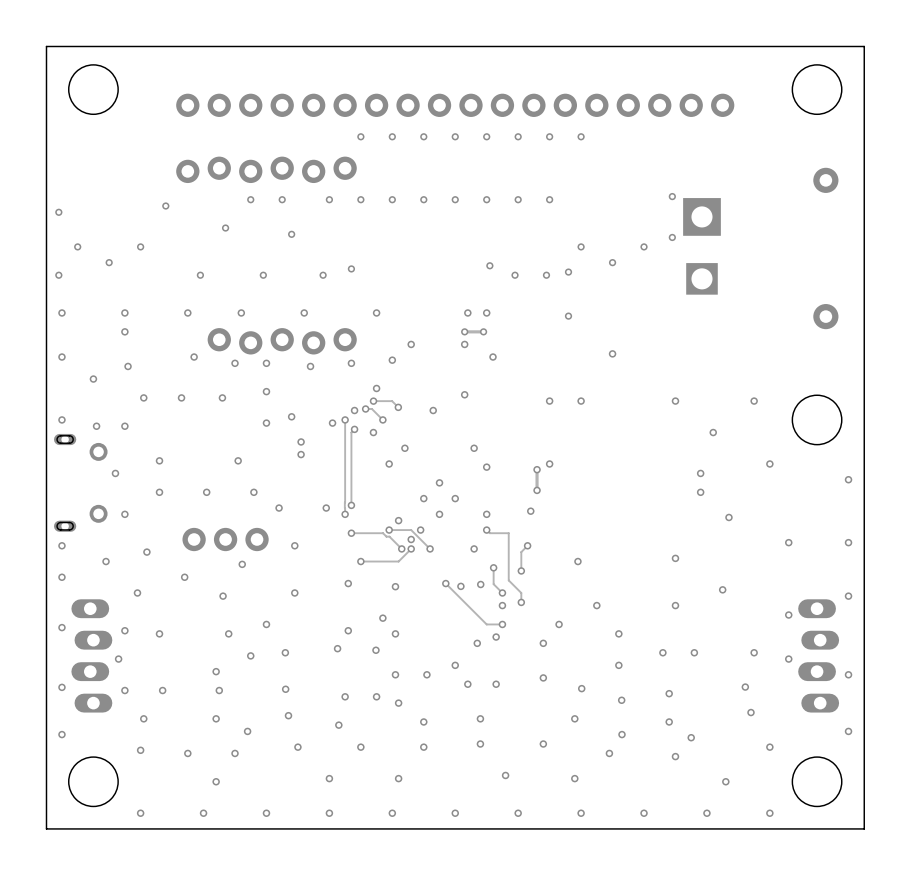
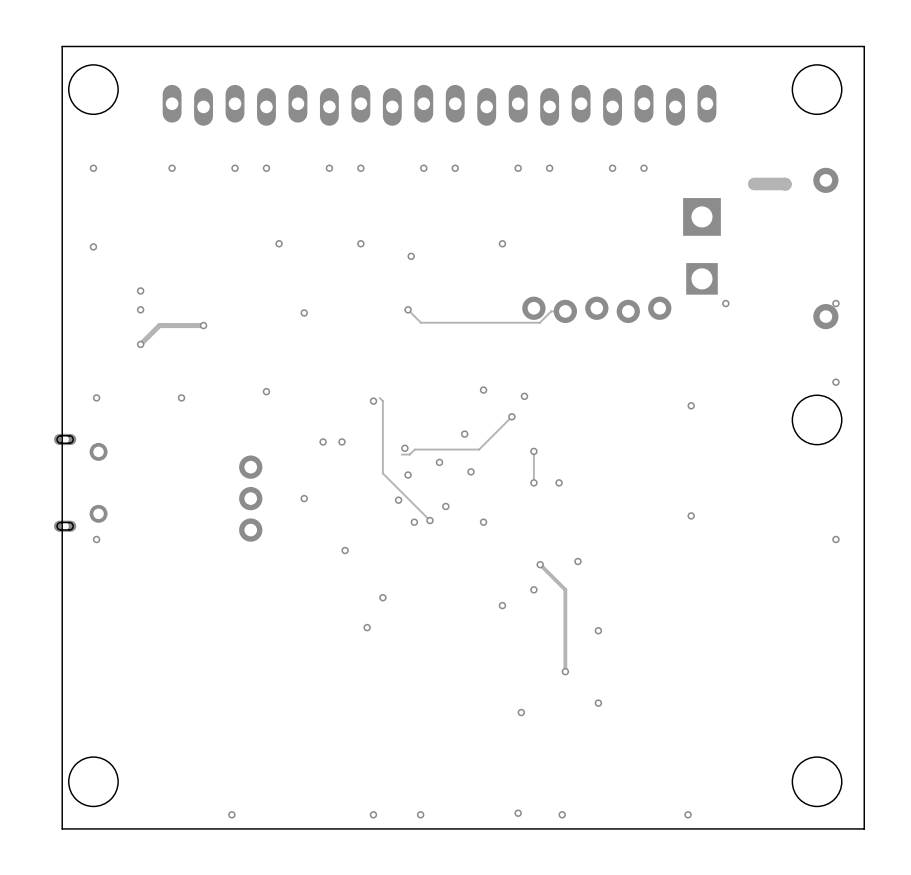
board edge: (62, 46) (46, 46) (46, 828) (62, 828) -> (62, 46) (62, 828)
part: none -> (297, 105)
part: (455, 105) -> none
part: none -> (581, 105)
via: (360, 136) -> none
via: (392, 136) -> none
via: (423, 136) -> none
via: (455, 136) -> none
via: (486, 136) -> none
via: (518, 136) -> none
via: (549, 136) -> none
via: (581, 136) -> none
via: none -> (93, 168)
via: none -> (172, 168)
via: none -> (235, 168)
via: none -> (266, 168)
via: none -> (329, 168)
via: none -> (360, 168)
via: none -> (423, 168)
via: none -> (455, 168)
via: none -> (518, 168)
via: none -> (549, 168)
via: none -> (612, 168)
via: none -> (644, 168)
part: (266, 169) -> none
track: none -> (754, 183) (785, 184)
via: (672, 196) -> none
via: (250, 199) -> none
via: (282, 199) -> none
via: (329, 199) -> none
via: (360, 199) -> none
via: (392, 199) -> none
via: (423, 199) -> none
via: (455, 199) -> none
via: (486, 199) -> none
via: (518, 199) -> none
via: (549, 199) -> none
via: (165, 206) -> none
via: (58, 212) -> none
via: (225, 228) -> none
via: (291, 234) -> none
via: (672, 237) -> none
via: none -> (279, 243)
via: none -> (360, 243)
via: none -> (502, 243)
via: (77, 246) -> none
via: none -> (93, 246)
via: (140, 246) -> none
via: (581, 246) -> none
via: (644, 246) -> none
via: none -> (411, 256)
via: (109, 262) -> none
via: (612, 262) -> none
via: (489, 265) -> none
via: (351, 268) -> none
via: (568, 272) -> none
via: (58, 275) -> none
via: (200, 275) -> none
via: (263, 275) -> none
via: (323, 275) -> none
via: (515, 275) -> none
via: (546, 275) -> none
via: none -> (140, 290)
via: none -> (725, 303)
via: none -> (835, 303)
via: none -> (140, 309)
track: none -> (408, 309) (420, 322) (539, 322) (551, 311) (565, 311)
via: none -> (408, 309)
part: none -> (596, 309)
via: (61, 312) -> none
via: (124, 312) -> none
via: (187, 312) -> none
via: (241, 312) -> none
via: (376, 312) -> none
via: (467, 312) -> none
via: (486, 312) -> none
via: (568, 316) -> none
track: none -> (203, 325) (159, 325) (140, 344)
via: none -> (203, 325)
via: (124, 331) -> none
via: (464, 331) -> none
track: (483, 331) (464, 331) -> none
via: (483, 331) -> none
part: (282, 341) -> none
via: none -> (140, 344)
via: (411, 344) -> none
via: (464, 344) -> none
via: (612, 353) -> none
via: (61, 357) -> none
via: (194, 357) -> none
via: (493, 357) -> none
via: (392, 360) -> none
via: (235, 363) -> none
via: (266, 363) -> none
via: (351, 363) -> none
via: (128, 366) -> none
via: (310, 366) -> none
via: (93, 379) -> none
via: none -> (835, 382)
via: (376, 388) -> none
via: none -> (483, 390)
via: (464, 394) -> none
via: none -> (524, 396)
via: none -> (96, 397)
via: (143, 397) -> none
via: (222, 397) -> none
track: none -> (379, 397) (382, 401) (382, 473) (429, 520)
track: (373, 401) (392, 401) (398, 407) -> none
via: (549, 401) -> none
via: (581, 401) -> none
via position: (675, 401) -> (691, 405)
via: (754, 401) -> none
via: (398, 407) -> none
track: (365, 409) (371, 409) (382, 419) -> none
via: (365, 409) -> none
via: (354, 410) -> none
via: (433, 410) -> none
via: (291, 416) -> none
track: none -> (511, 416) (479, 449) (414, 449) (409, 454) (401, 454)
via: none -> (511, 416)
via: (61, 419) -> none
track: (345, 419) (345, 514) -> none
via: (345, 419) -> none
via: (382, 419) -> none
via: (266, 423) -> none
via: (332, 423) -> none
via: (96, 426) -> none
via: (124, 426) -> none
track: (354, 429) (351, 432) (351, 505) -> none
via: (354, 429) -> none
via: (373, 432) -> none
via: (713, 432) -> none
via: none -> (464, 434)
via: (301, 441) -> none
via: none -> (323, 441)
via: none -> (341, 441)
via: (474, 448) -> none
track: none -> (533, 451) (533, 482)
via: none -> (533, 451)
via: (301, 454) -> none
via: (159, 460) -> none
via: (238, 460) -> none
via: none -> (439, 462)
via: (389, 463) -> none
via: (549, 463) -> none
via: (769, 463) -> none
via: (486, 467) -> none
track: (537, 469) (537, 490) -> none
via: (537, 469) -> none
via: none -> (470, 471)
via: (115, 473) -> none
via: (700, 473) -> none
via: none -> (408, 475)
via: (848, 479) -> none
via: (439, 482) -> none
via: none -> (533, 482)
via: none -> (559, 482)
via: (537, 490) -> none
via: (159, 492) -> none
via: (206, 492) -> none
via: (253, 492) -> none
via: (700, 492) -> none
via: none -> (304, 498)
via: (423, 498) -> none
via: (455, 498) -> none
via: none -> (398, 500)
via: (351, 505) -> none
via: none -> (445, 506)
via: (279, 508) -> none
via: (326, 508) -> none
via: (530, 511) -> none
via: (124, 514) -> none
via: (345, 514) -> none
via: (439, 514) -> none
via: (486, 514) -> none
via: none -> (691, 515)
via: (728, 517) -> none
via: (398, 520) -> none
via: none -> (429, 520)
via: none -> (414, 522)
via: none -> (483, 522)
track: (389, 530) (411, 530) (430, 548) -> none
via: (389, 530) -> none
via: (420, 530) -> none
track: (486, 530) (489, 533) (508, 533) (508, 580) (521, 592) (521, 602) -> none
via: (486, 530) -> none
track: (351, 533) (383, 533) (389, 536) (401, 548) -> none
via: (351, 533) -> none
via: none -> (96, 539)
part rotation: 0° (225, 539) -> 90° clockwise (250, 498)
via: (411, 539) -> none
via: (788, 542) -> none
via position: (848, 542) -> (835, 539)
via: (61, 545) -> none
via: (294, 545) -> none
track: (527, 545) (521, 552) (521, 570) -> none
via: (527, 545) -> none
via: (401, 548) -> none
track: (411, 548) (398, 561) (360, 561) -> none
via: (411, 548) -> none
via: (430, 548) -> none
via: (474, 548) -> none
via: none -> (345, 550)
via: (146, 552) -> none
via: (675, 558) -> none
via: (106, 561) -> none
via: (360, 561) -> none
via: (242, 564) -> none
track: none -> (540, 564) (565, 589) (565, 671)
via: none -> (540, 564)
track: (493, 567) (493, 584) (502, 592) -> none
via: (493, 567) -> none
via: (521, 570) -> none
via: (61, 577) -> none
via: (184, 577) -> none
via: (348, 583) -> none
track: (445, 583) (486, 624) (502, 624) -> none
via: (445, 583) -> none
via: (480, 584) -> none
via: (395, 586) -> none
via: (460, 586) -> none
via: none -> (533, 589)
via: (722, 589) -> none
via: (137, 592) -> none
via: (294, 592) -> none
via: (502, 592) -> none
via: (223, 596) -> none
via: (848, 596) -> none
via: none -> (382, 597)
via: (521, 602) -> none
via: (596, 605) -> none
via: (675, 605) -> none
via: (788, 615) -> none
via: (382, 618) -> none
via: (266, 624) -> none
via: (502, 624) -> none
via: (559, 624) -> none
via: (61, 627) -> none
via: none -> (367, 627)
via: (124, 630) -> none
via: (348, 630) -> none
via: none -> (598, 630)
via: (159, 633) -> none
via: (228, 633) -> none
via: (395, 633) -> none
via: (618, 633) -> none
via: (496, 637) -> none
via: (477, 643) -> none
via: (543, 643) -> none
via: (337, 648) -> none
via: (375, 650) -> none
via: (285, 652) -> none
via: (662, 652) -> none
via: (694, 652) -> none
via: (754, 652) -> none
part: (91, 655) -> none
via: (250, 655) -> none
part: (818, 655) -> none
via: (118, 659) -> none
via: (788, 659) -> none
via: (455, 665) -> none
via: (618, 665) -> none
via: (216, 671) -> none
via: none -> (565, 671)
via: (395, 674) -> none
via: (426, 674) -> none
via: (848, 674) -> none
via: (543, 677) -> none
via: (467, 684) -> none
via: (496, 684) -> none
via: (61, 687) -> none
via: (745, 687) -> none
via: (581, 688) -> none
via: (285, 689) -> none
via: (124, 690) -> none
via: (162, 690) -> none
via: (219, 690) -> none
via: (669, 693) -> none
via: (345, 696) -> none
via: (376, 696) -> none
via: (621, 700) -> none
via: (398, 703) -> none
via: none -> (598, 703)
via: none -> (521, 712)
via: (750, 712) -> none
via: (288, 715) -> none
via: (143, 718) -> none
via: (216, 718) -> none
via: (480, 718) -> none
via: (574, 718) -> none
via: (423, 721) -> none
via: (669, 721) -> none
via: (338, 725) -> none
via: (247, 731) -> none
via: (848, 731) -> none
via: (61, 734) -> none
via: (622, 734) -> none
via: (691, 737) -> none
via: (480, 744) -> none
via: (543, 744) -> none
via: (297, 747) -> none
via: (360, 747) -> none
via: (423, 747) -> none
via: (769, 747) -> none
via: (140, 750) -> none
via: (187, 753) -> none
via: (235, 753) -> none
via: (609, 753) -> none
via: (675, 756) -> none
via: (505, 775) -> none
via: (329, 778) -> none
via: (398, 778) -> none
via: (574, 778) -> none
via: (216, 781) -> none
via: (725, 781) -> none
via: (140, 813) -> none
via: (203, 813) -> none
via: (266, 813) -> none
via: (329, 813) -> none
via: (392, 813) -> none
via: (455, 813) -> none
via position: (581, 813) -> (562, 814)
via: (644, 813) -> none
via position: (706, 813) -> (688, 814)
via: (769, 813) -> none
via: none -> (231, 814)
via: none -> (373, 814)
via: none -> (420, 814)

